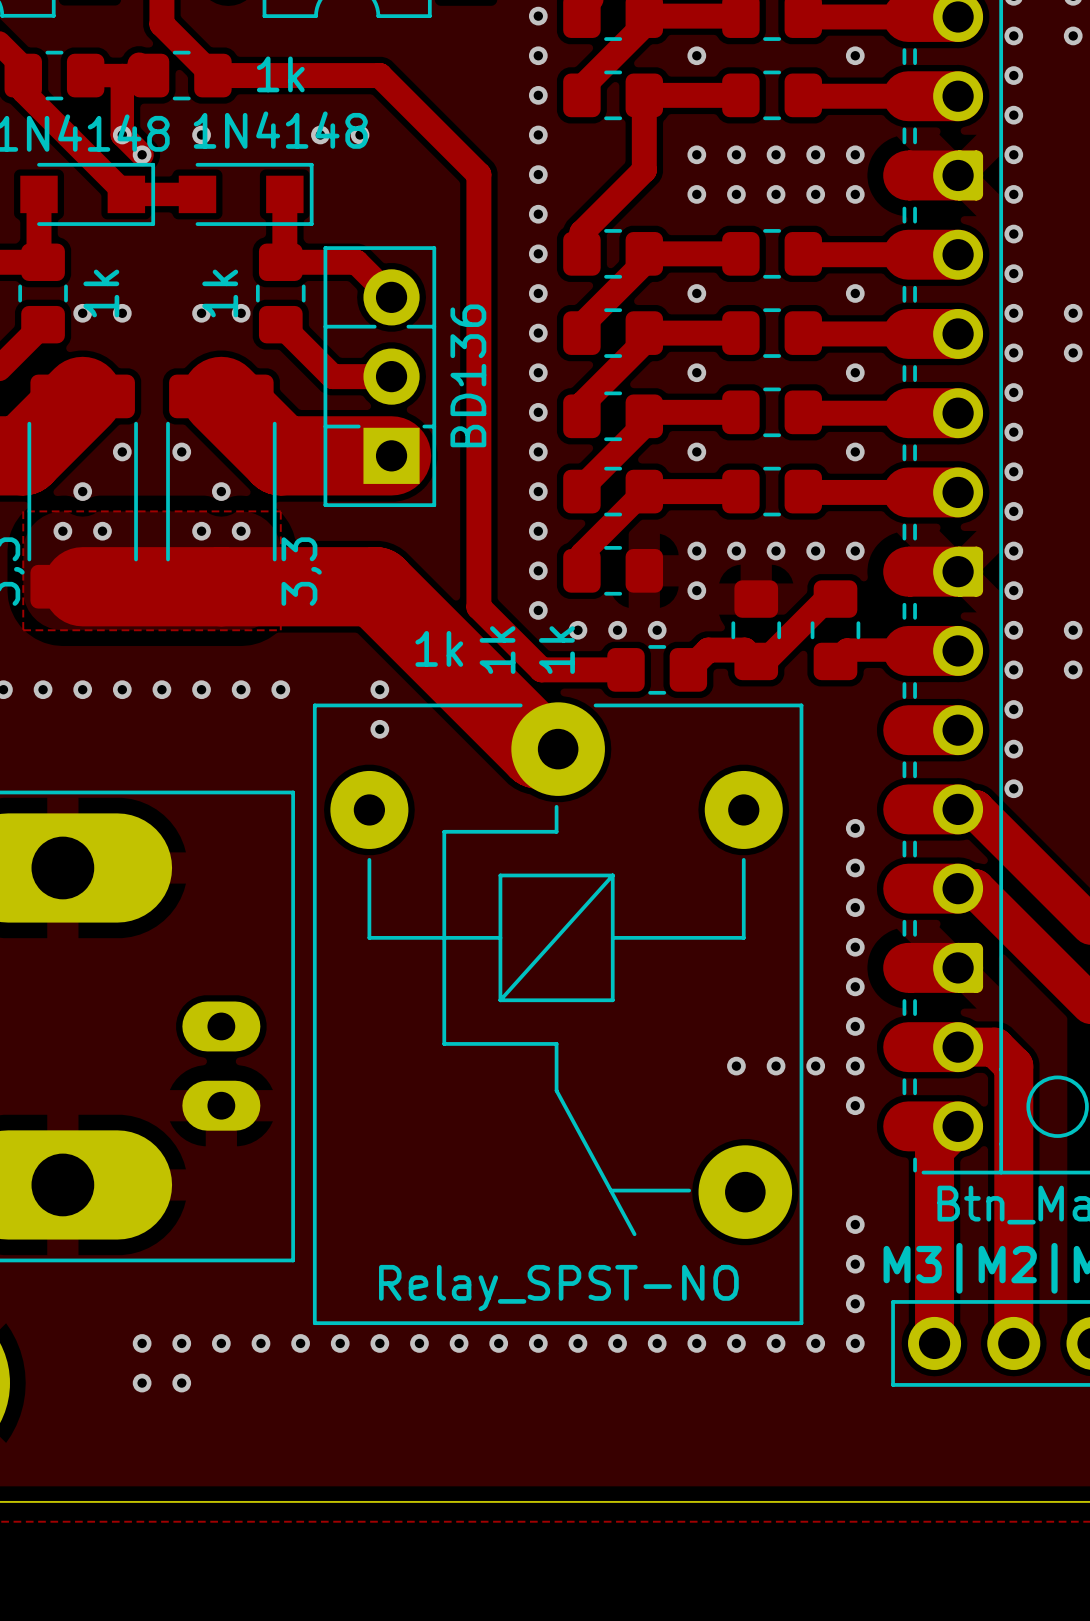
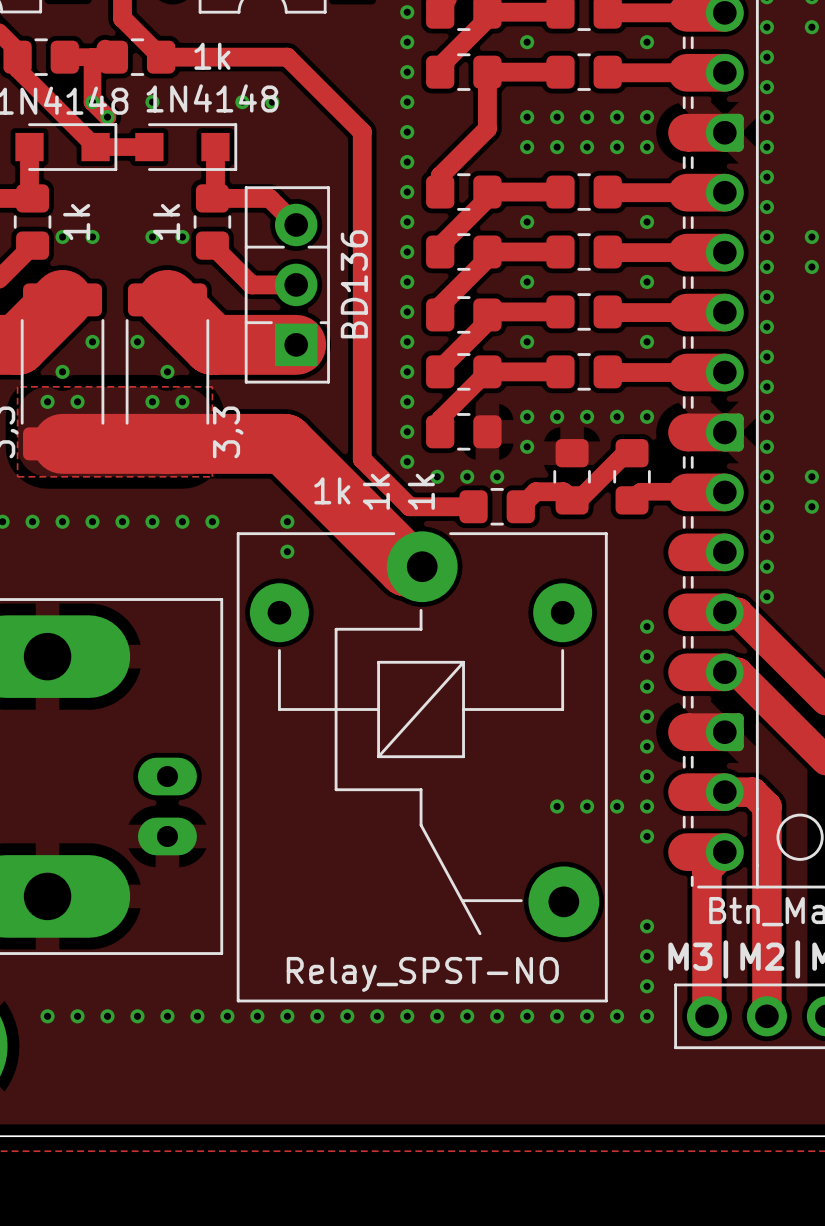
via: none -> (47, 1016)
via: none -> (77, 1016)
via: (142, 1383) -> none
via: (181, 1383) -> none

